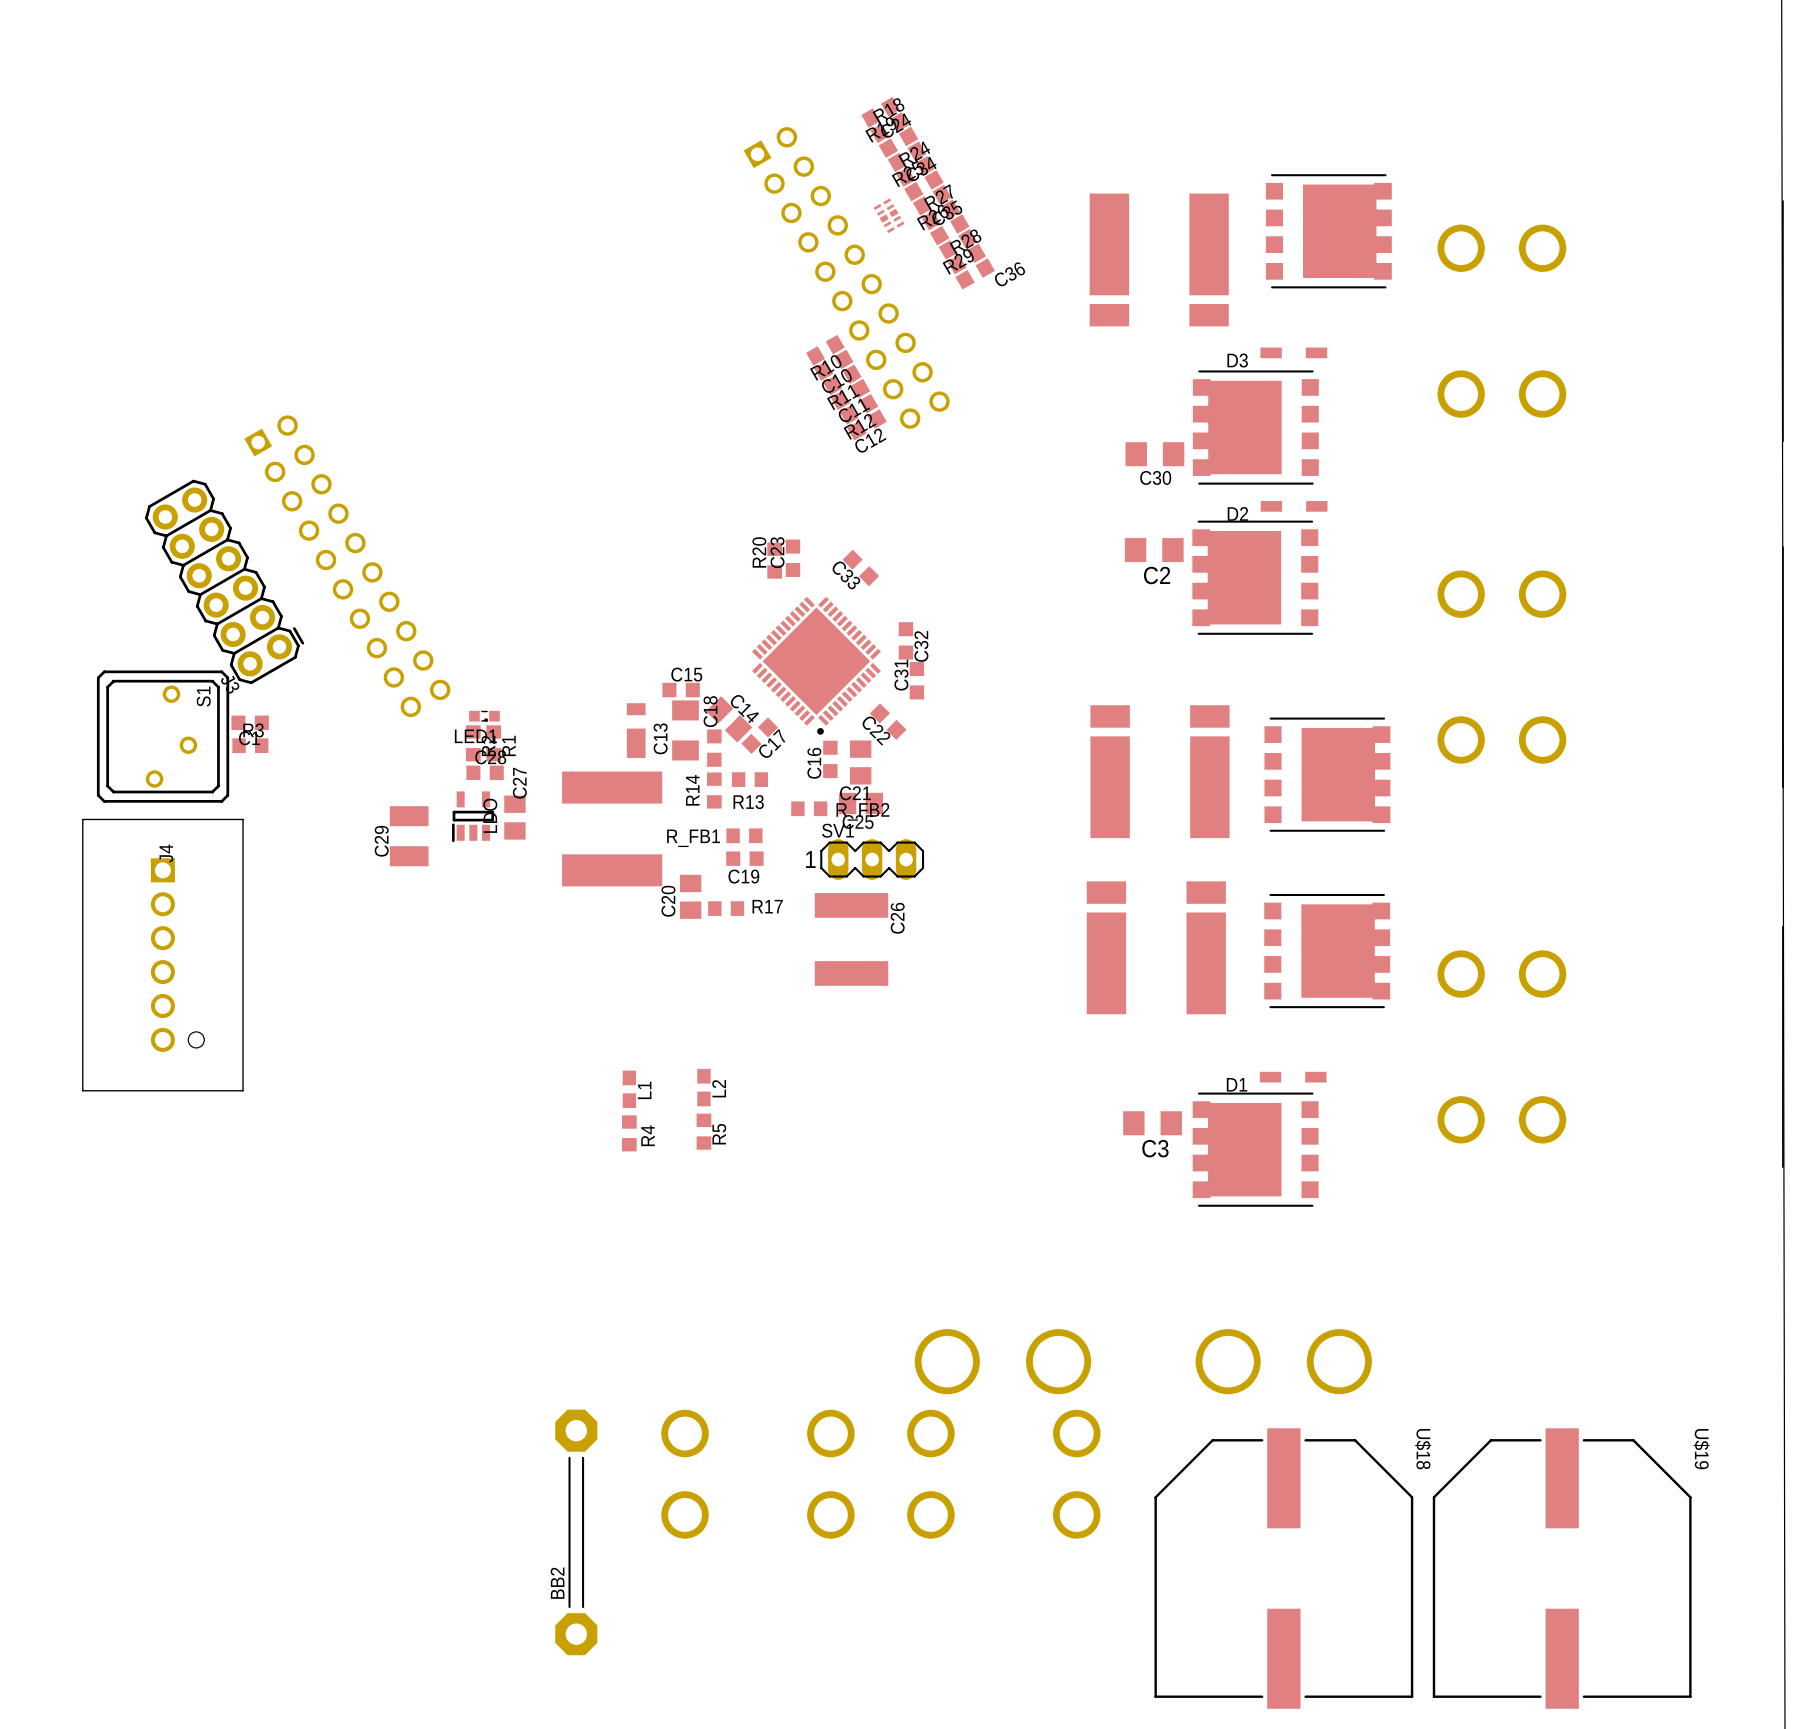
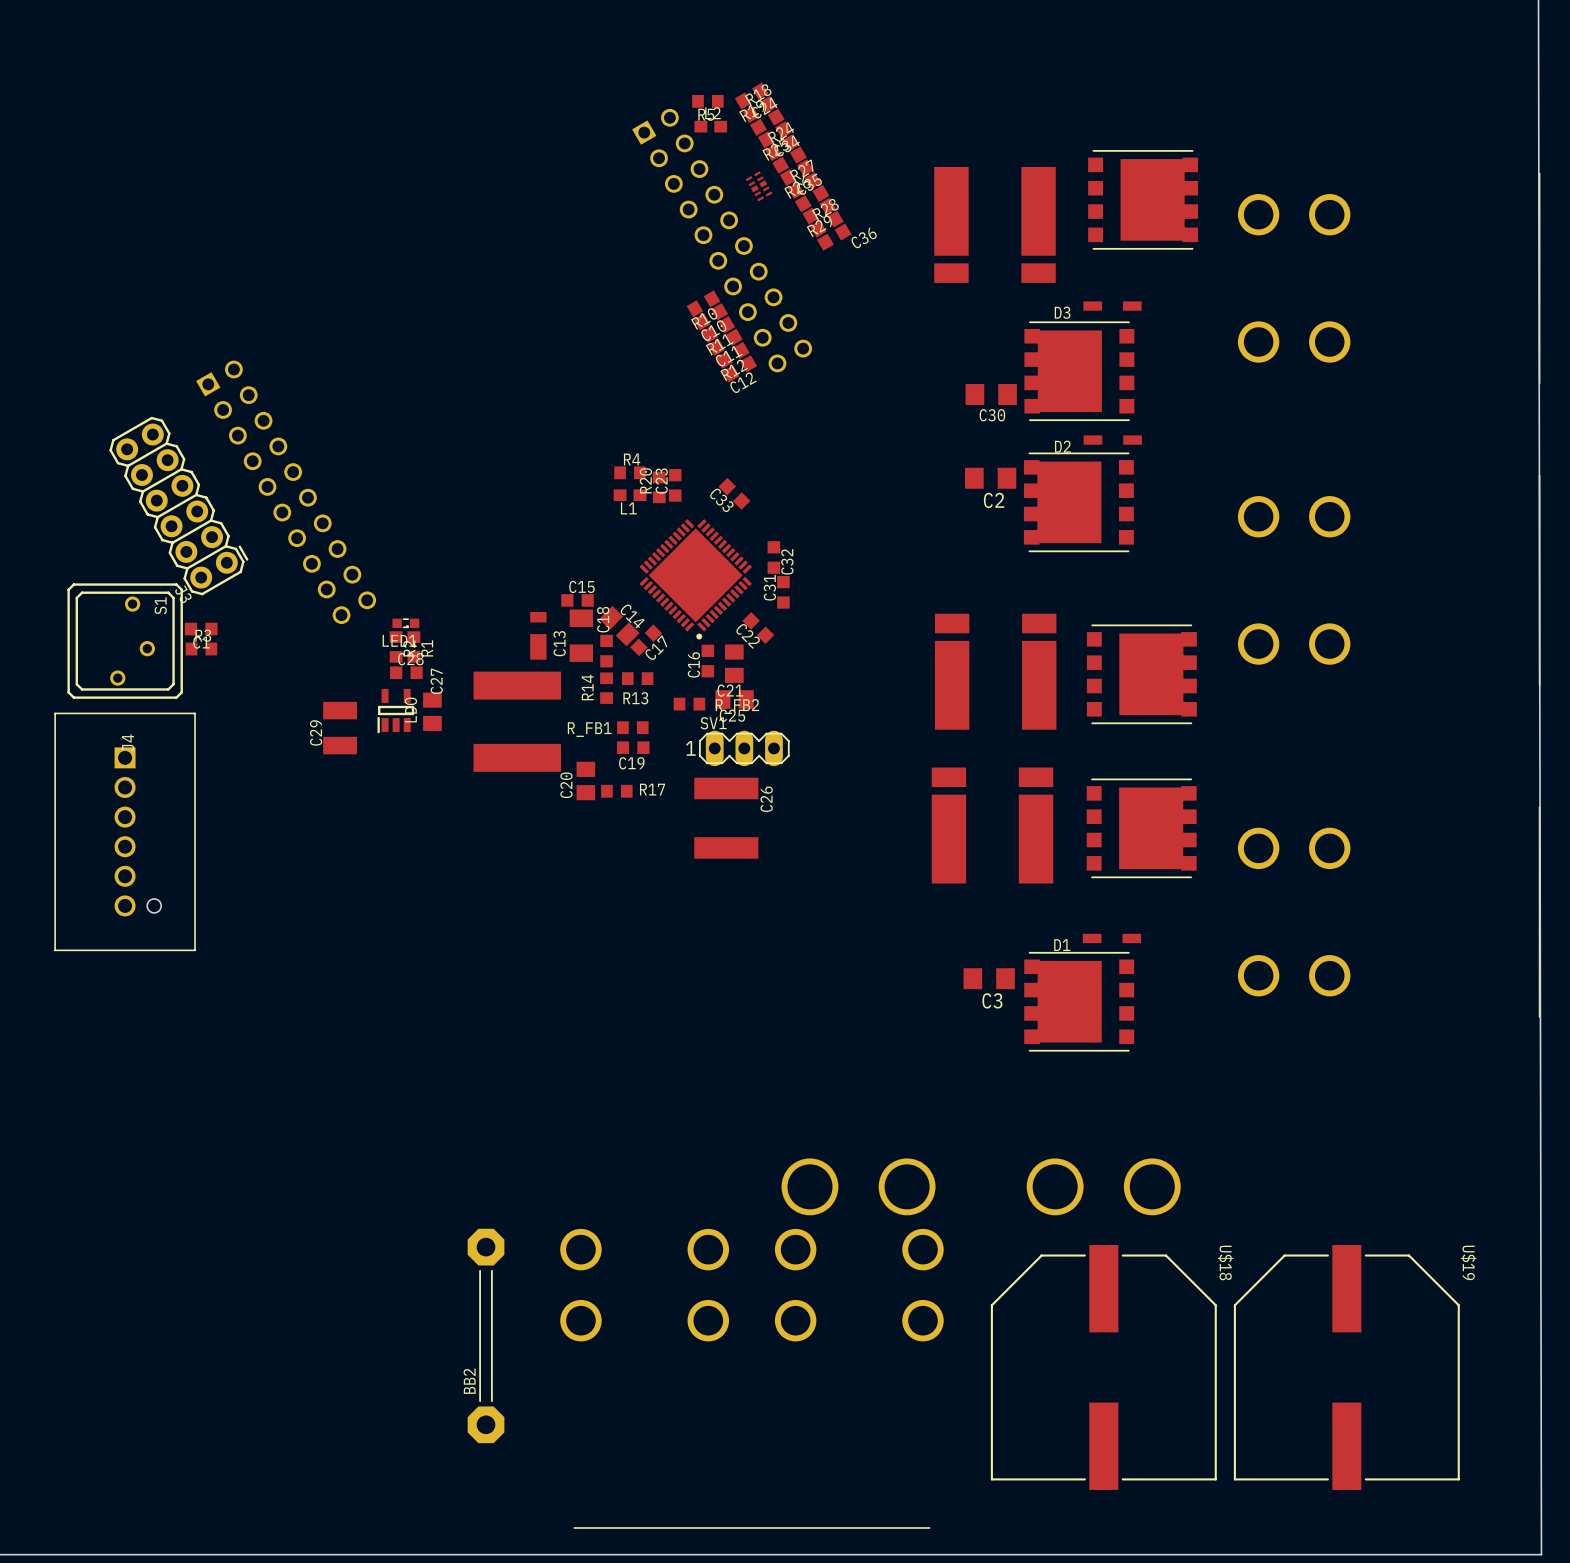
L2 rotation: 0° (703, 1087) -> 90° clockwise (710, 126)
L2 position: (703, 1087) -> (710, 126)
L1 rotation: 0° (629, 1089) -> 90° clockwise (630, 495)
L1 position: (629, 1089) -> (630, 495)
R5 rotation: 0° (703, 1131) -> 90° clockwise (707, 101)
R5 position: (703, 1131) -> (707, 101)
R4 rotation: 0° (629, 1133) -> 90° clockwise (629, 472)
R4 position: (629, 1133) -> (629, 472)

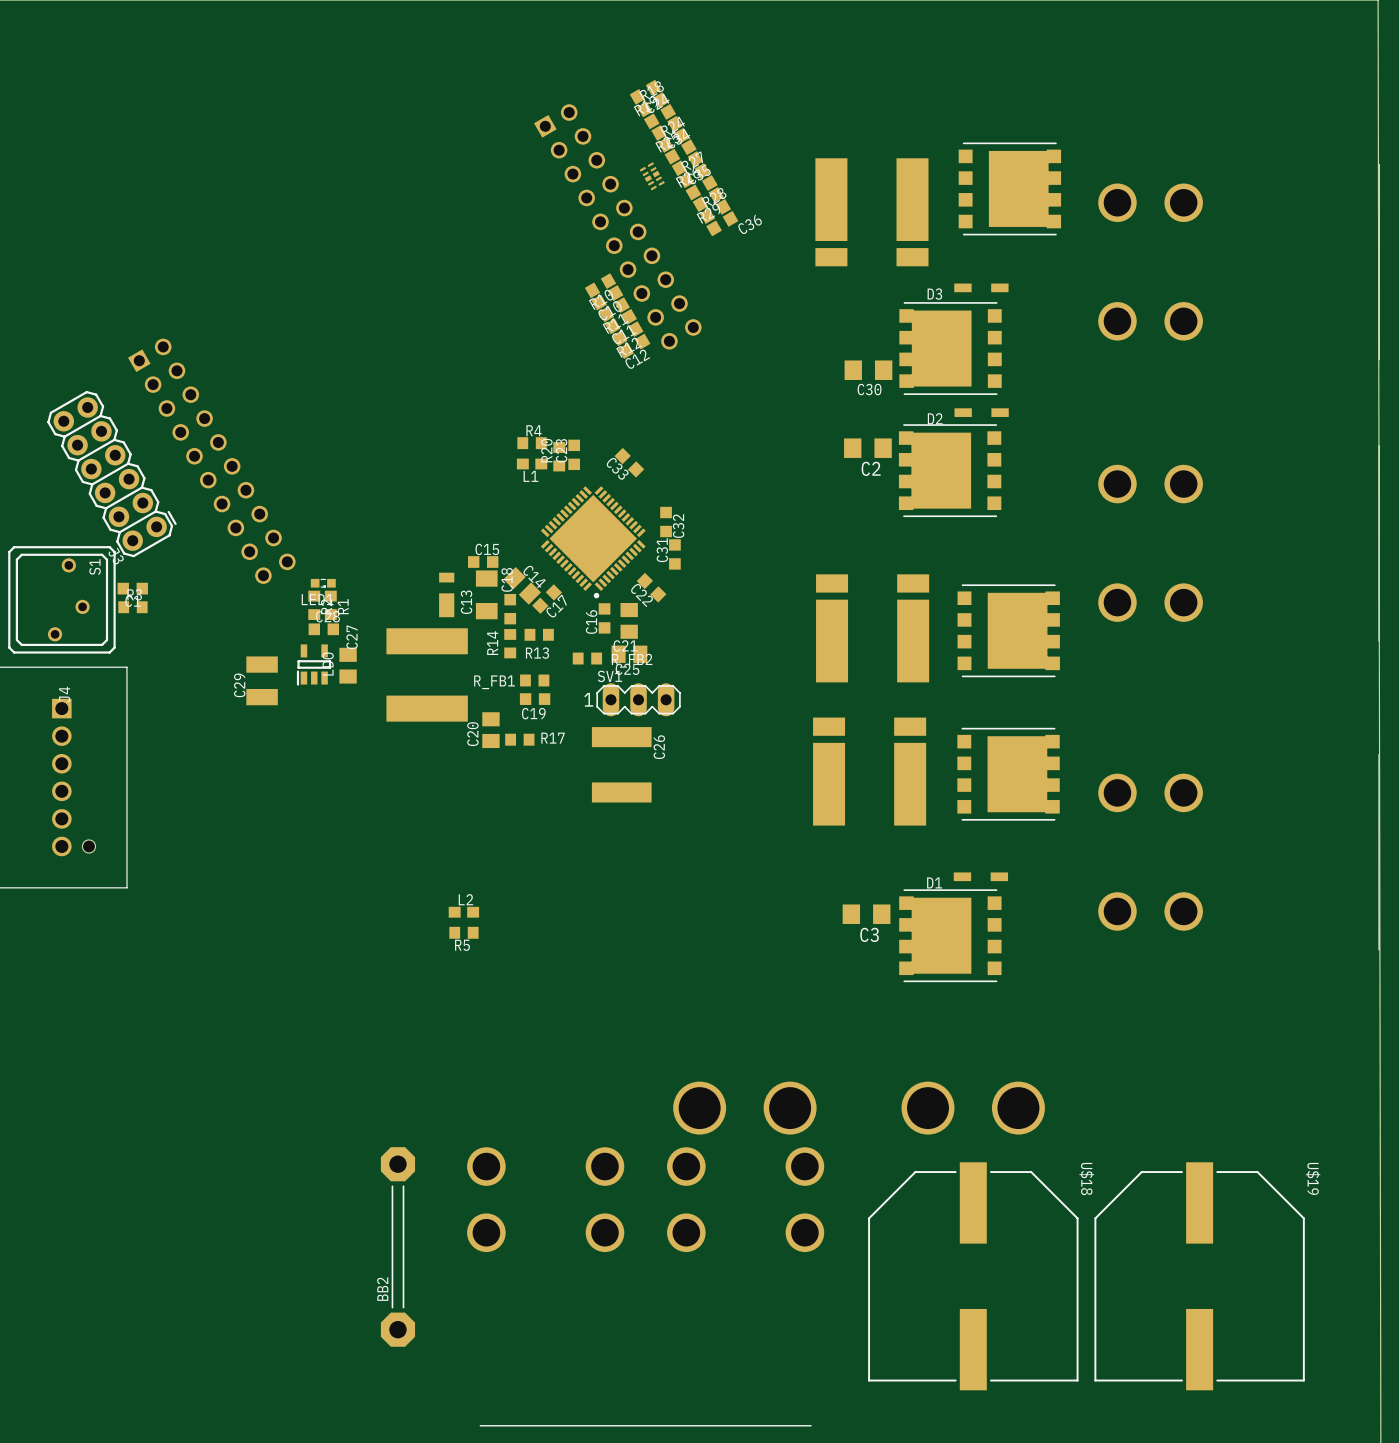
R5 position: (707, 101) -> (463, 932)
L2 position: (710, 126) -> (463, 912)

